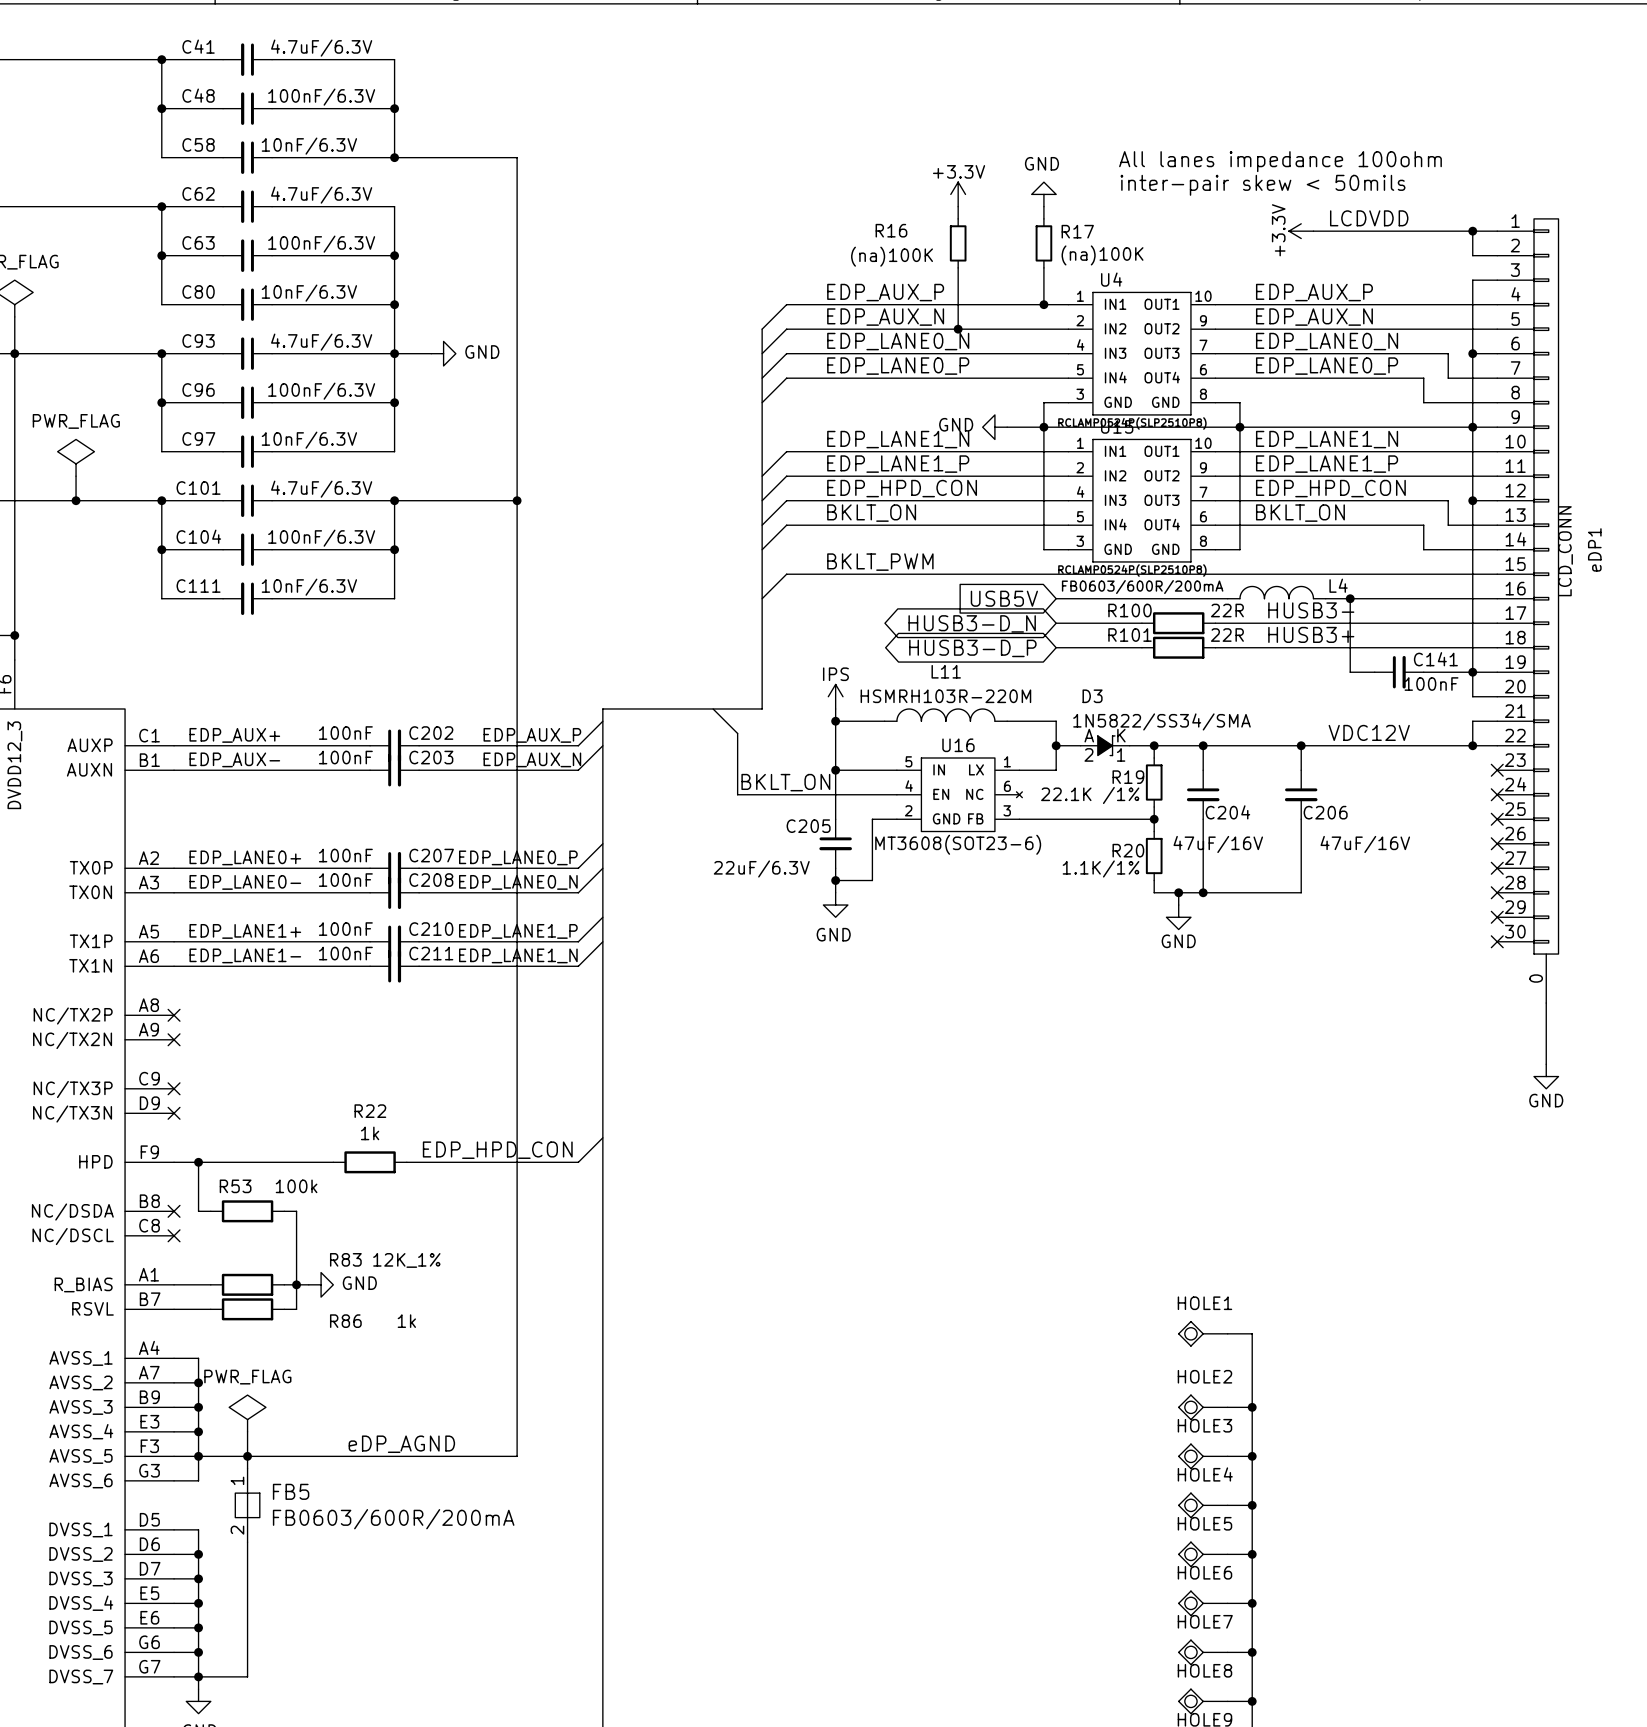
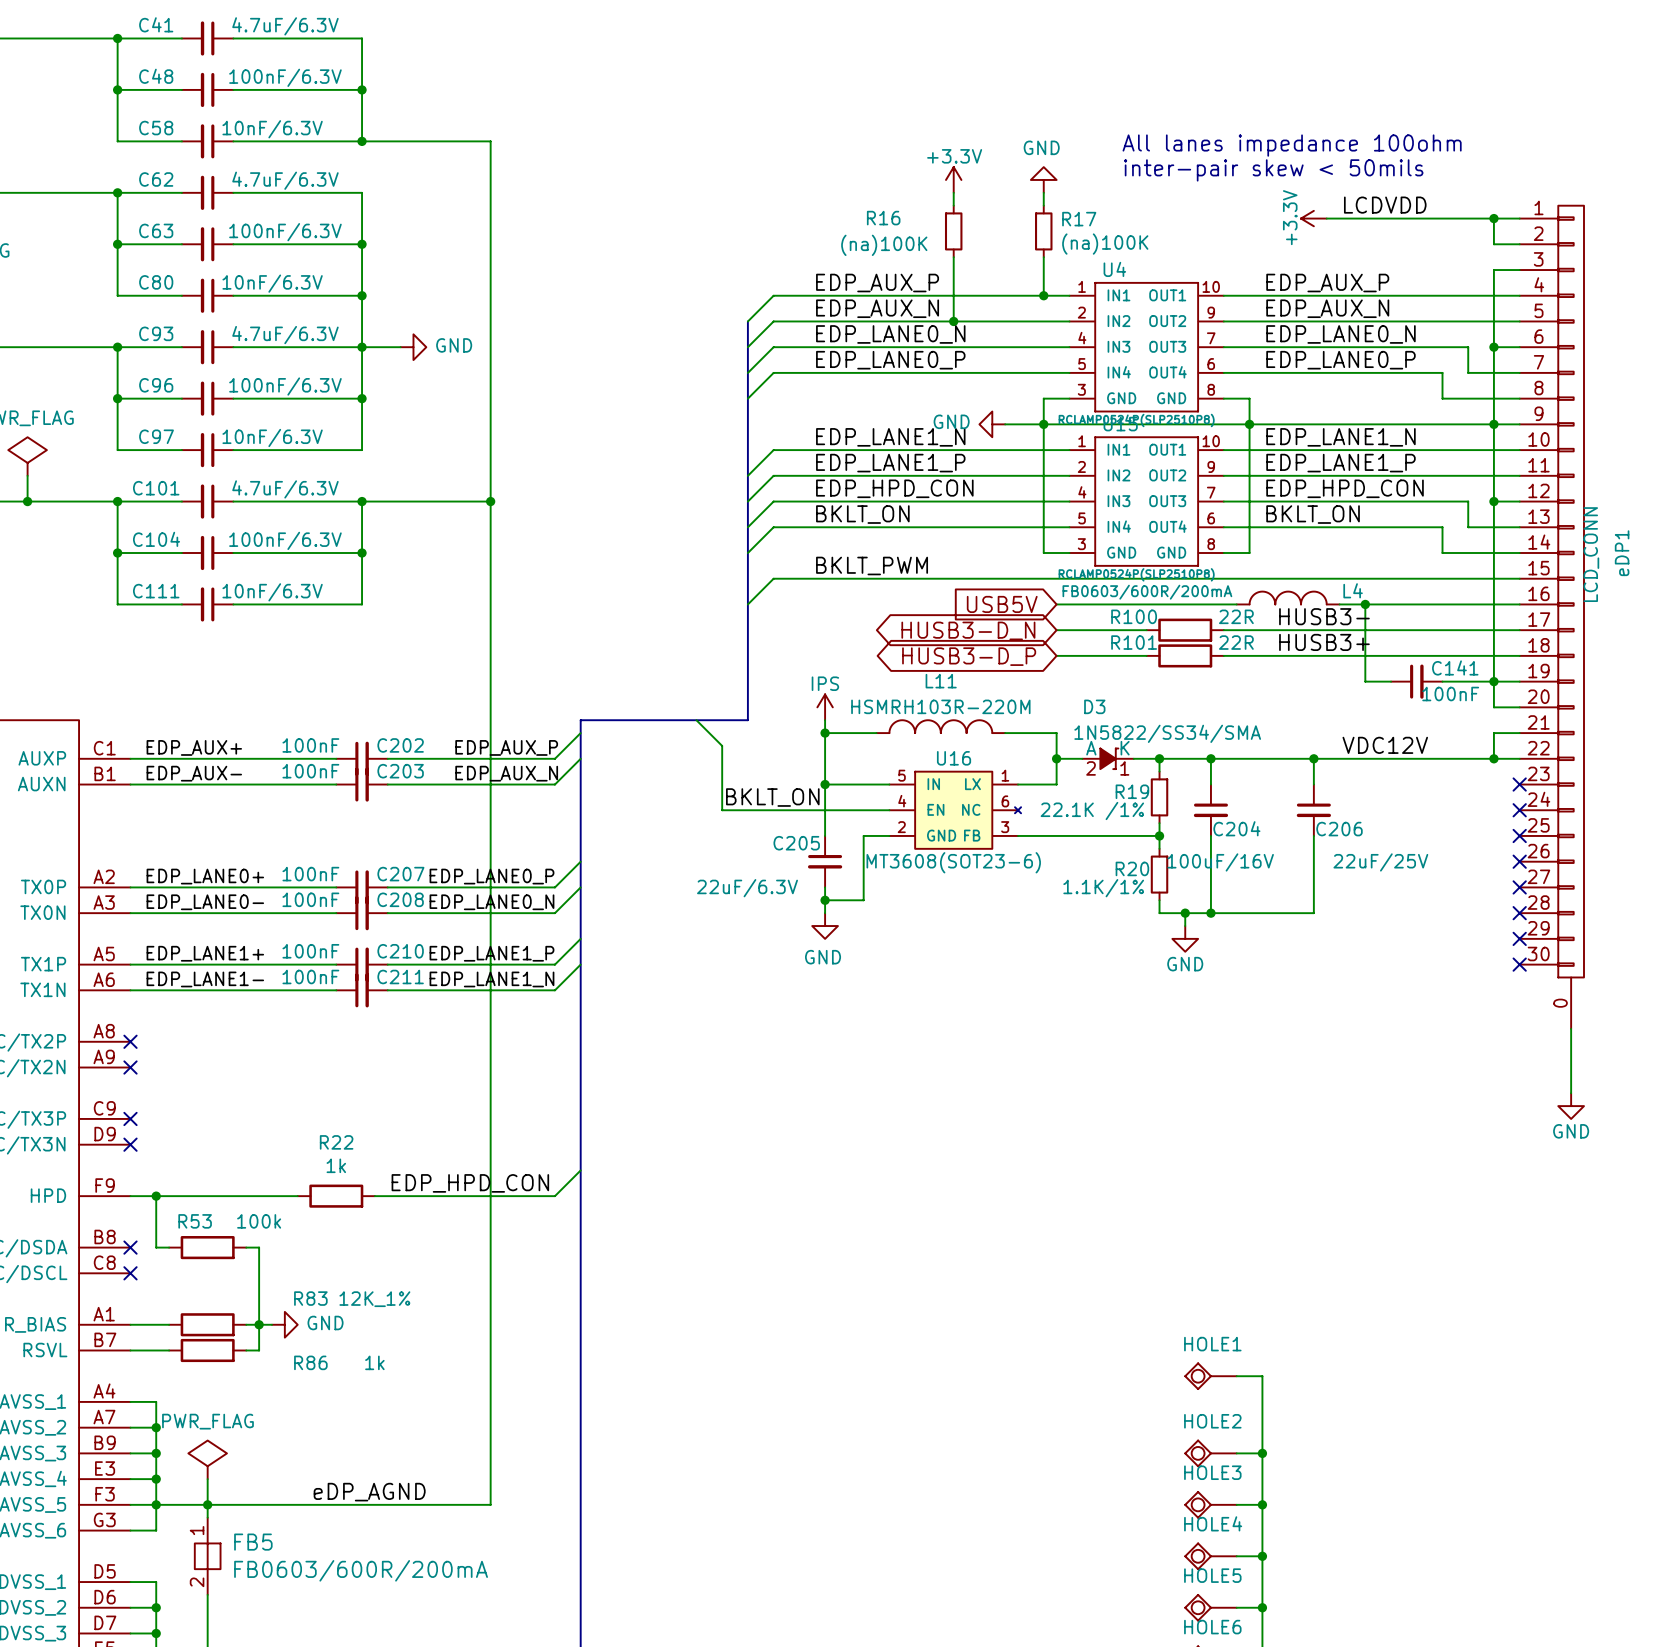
C204 value: 47uF/16V (1218, 844) -> 100uF/16V (1220, 862)
C206 value: 47uF/16V (1365, 844) -> 22uF/25V (1380, 862)

